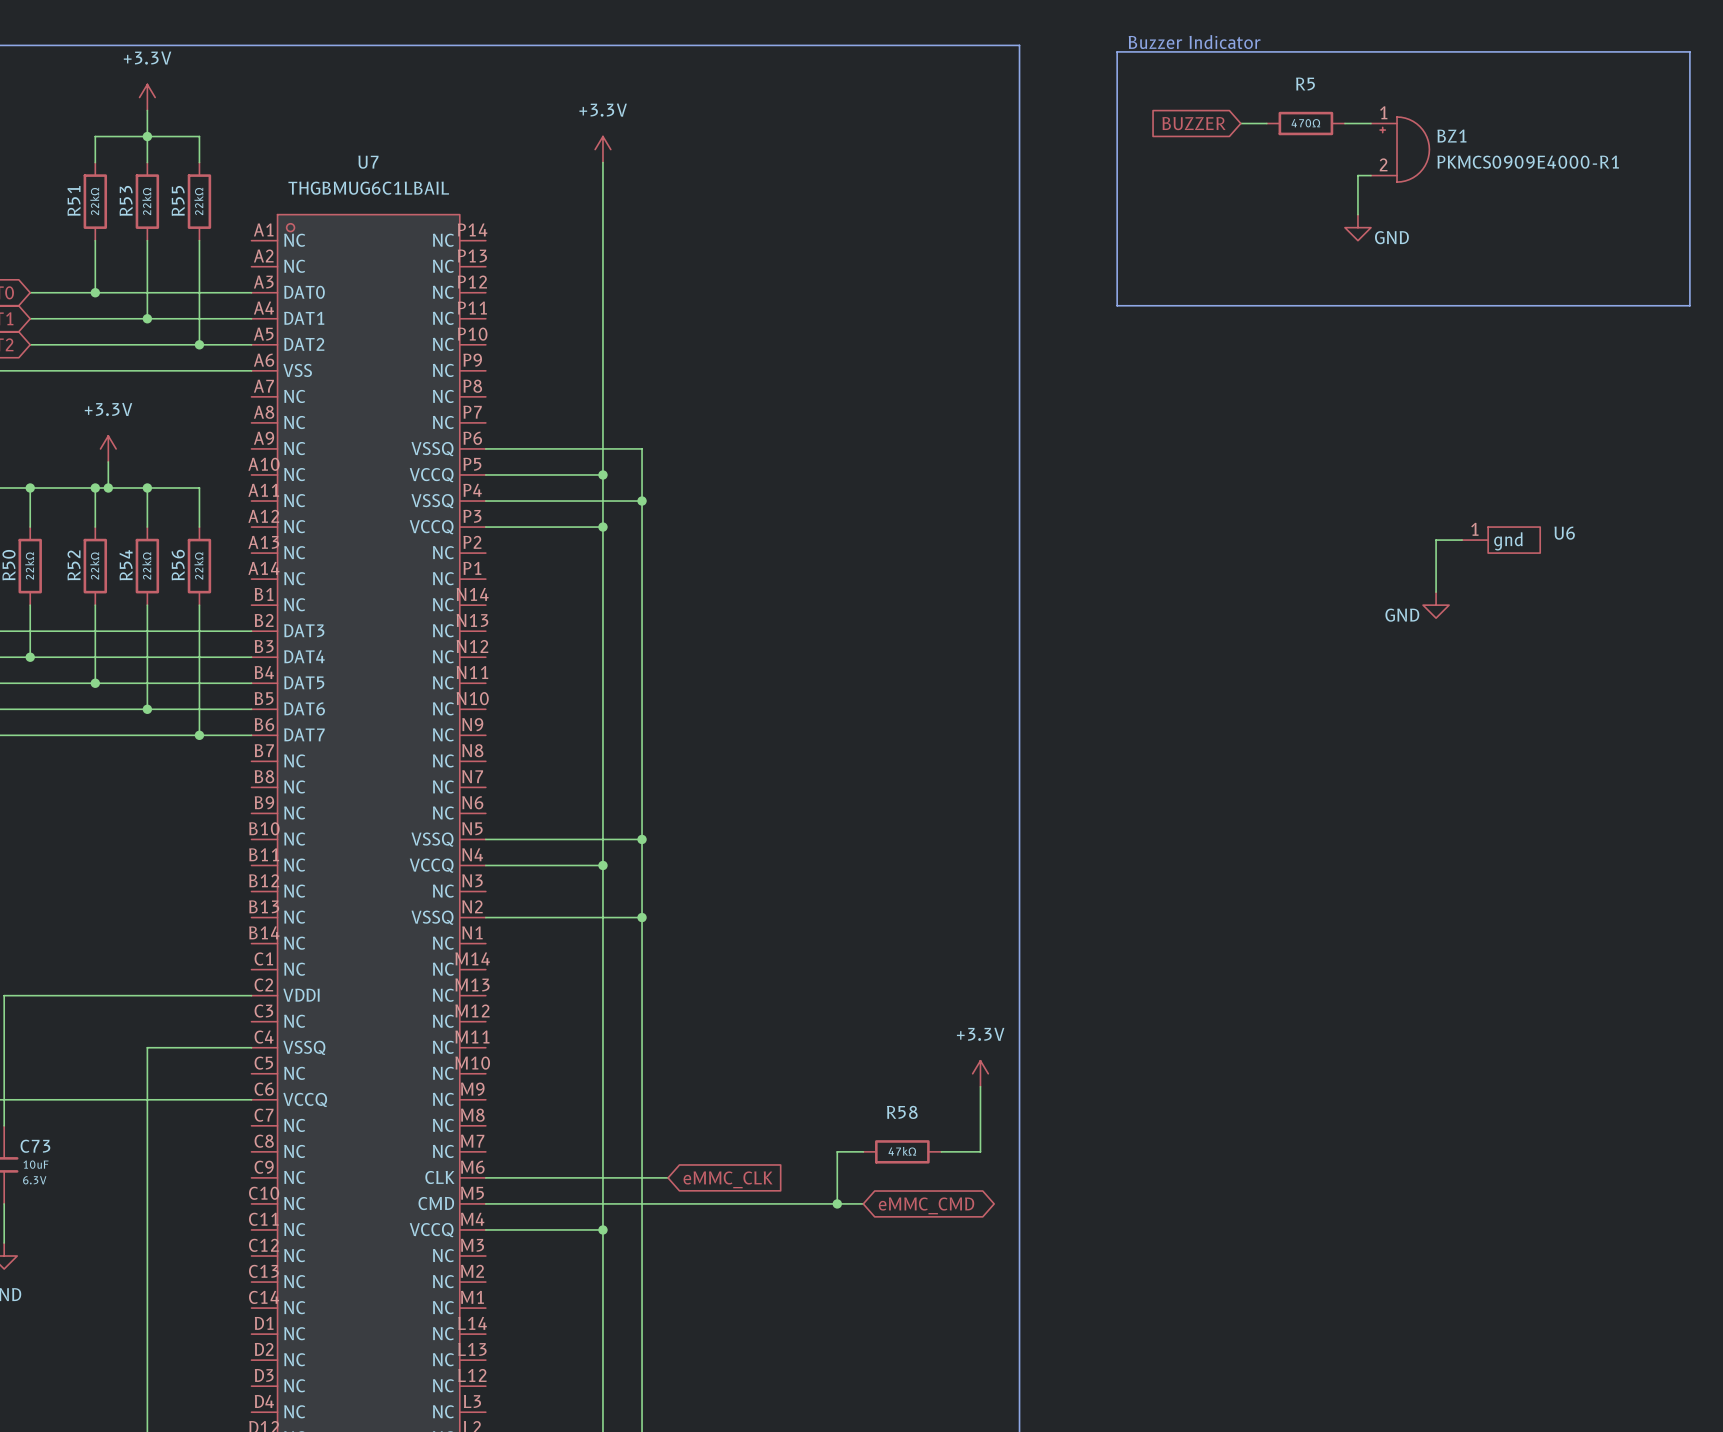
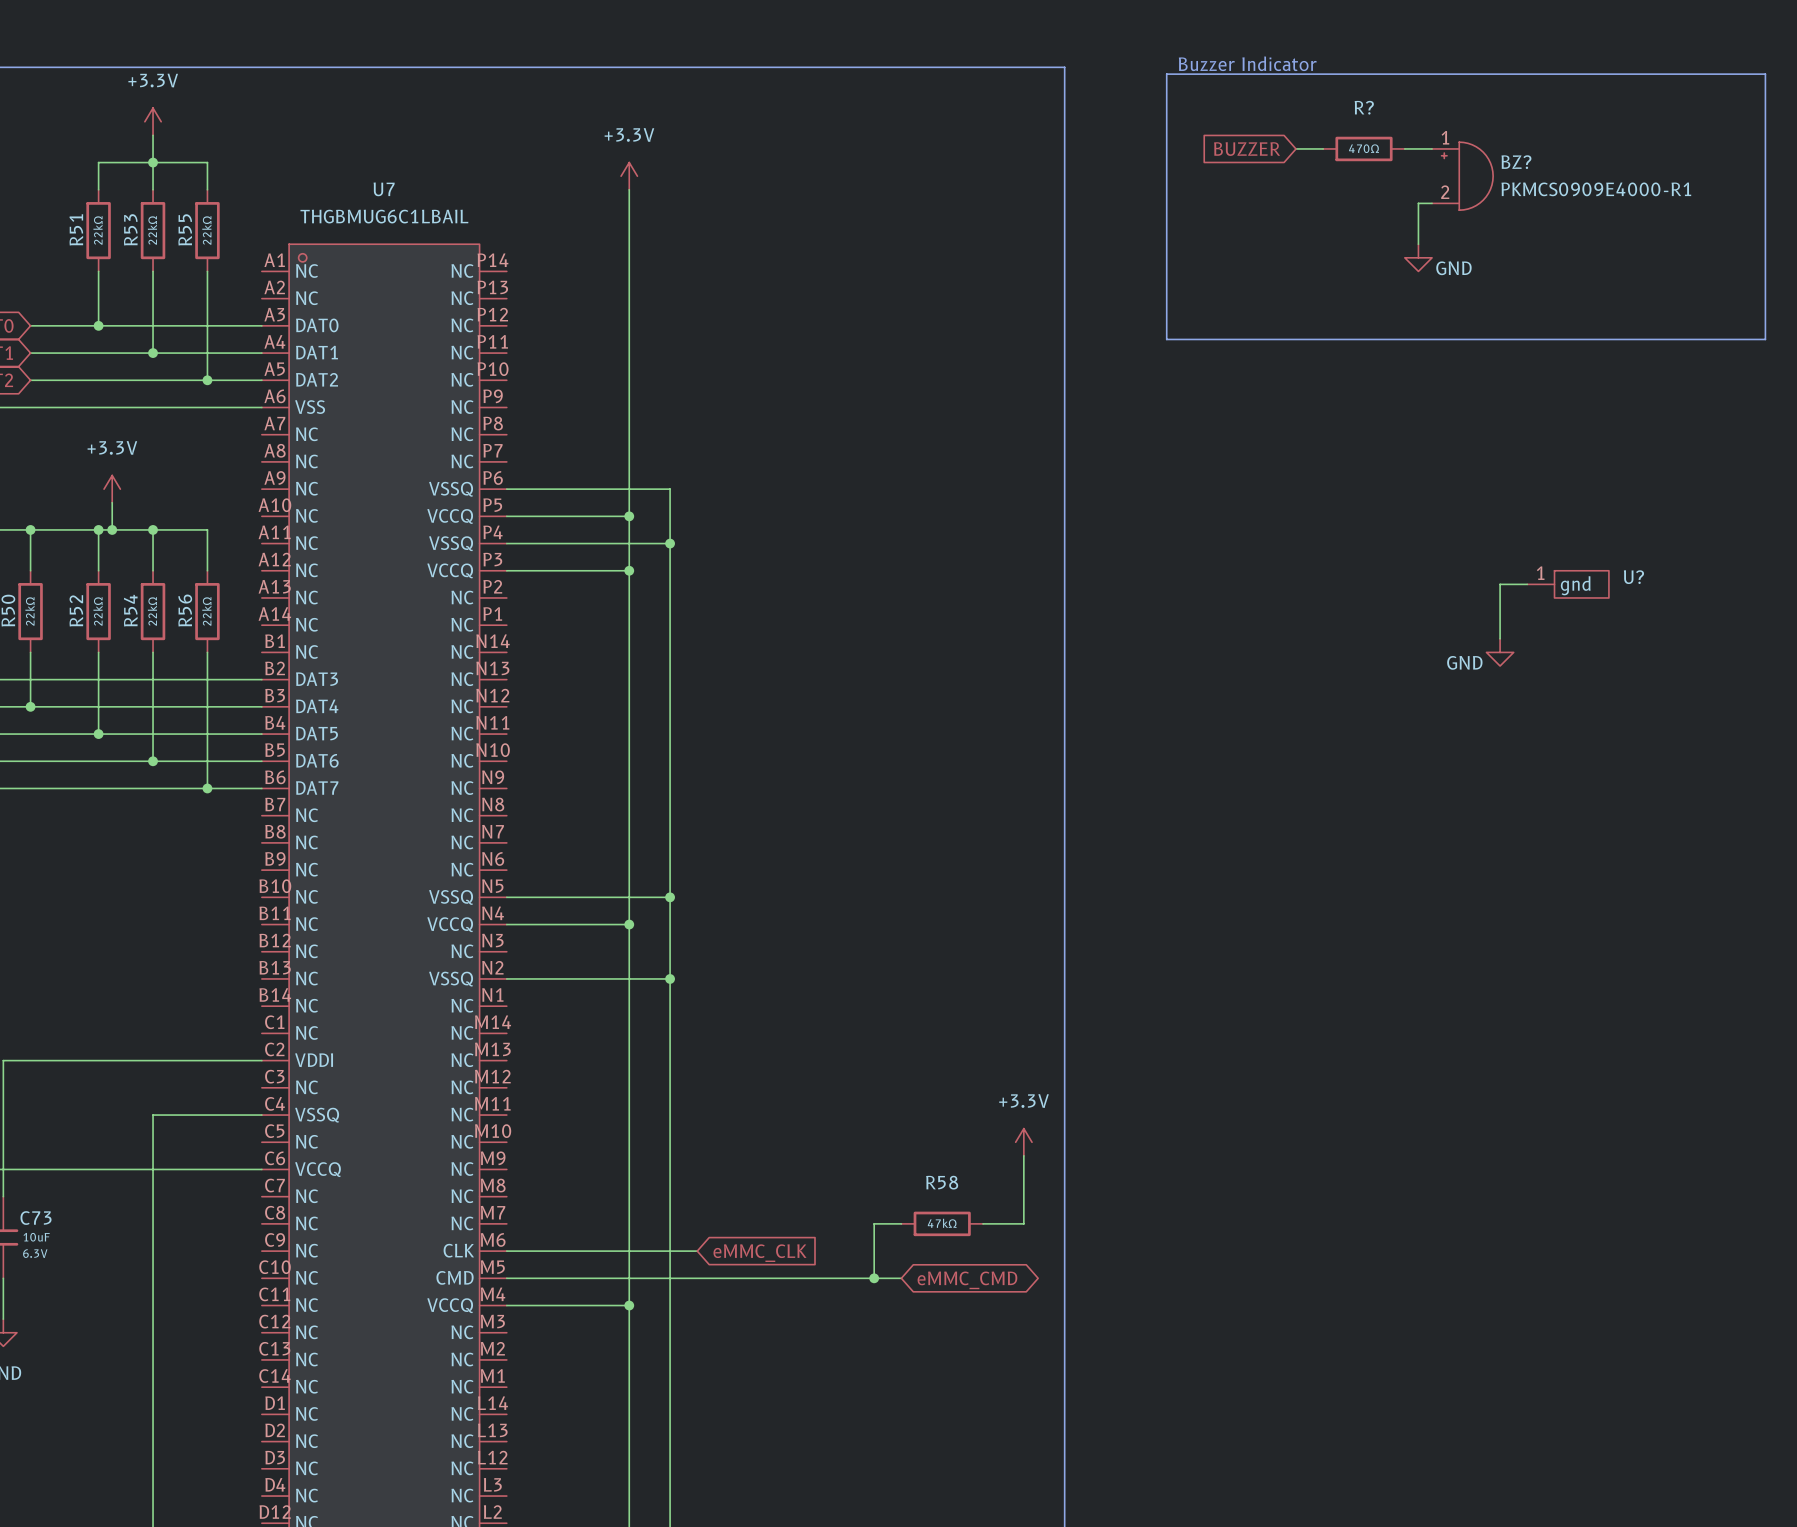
R5 name: R5 (1305, 84) -> R? (1364, 107)
BZ1 name: BZ1 (1451, 136) -> BZ? (1516, 162)
U6 name: U6 (1564, 533) -> U? (1633, 577)

